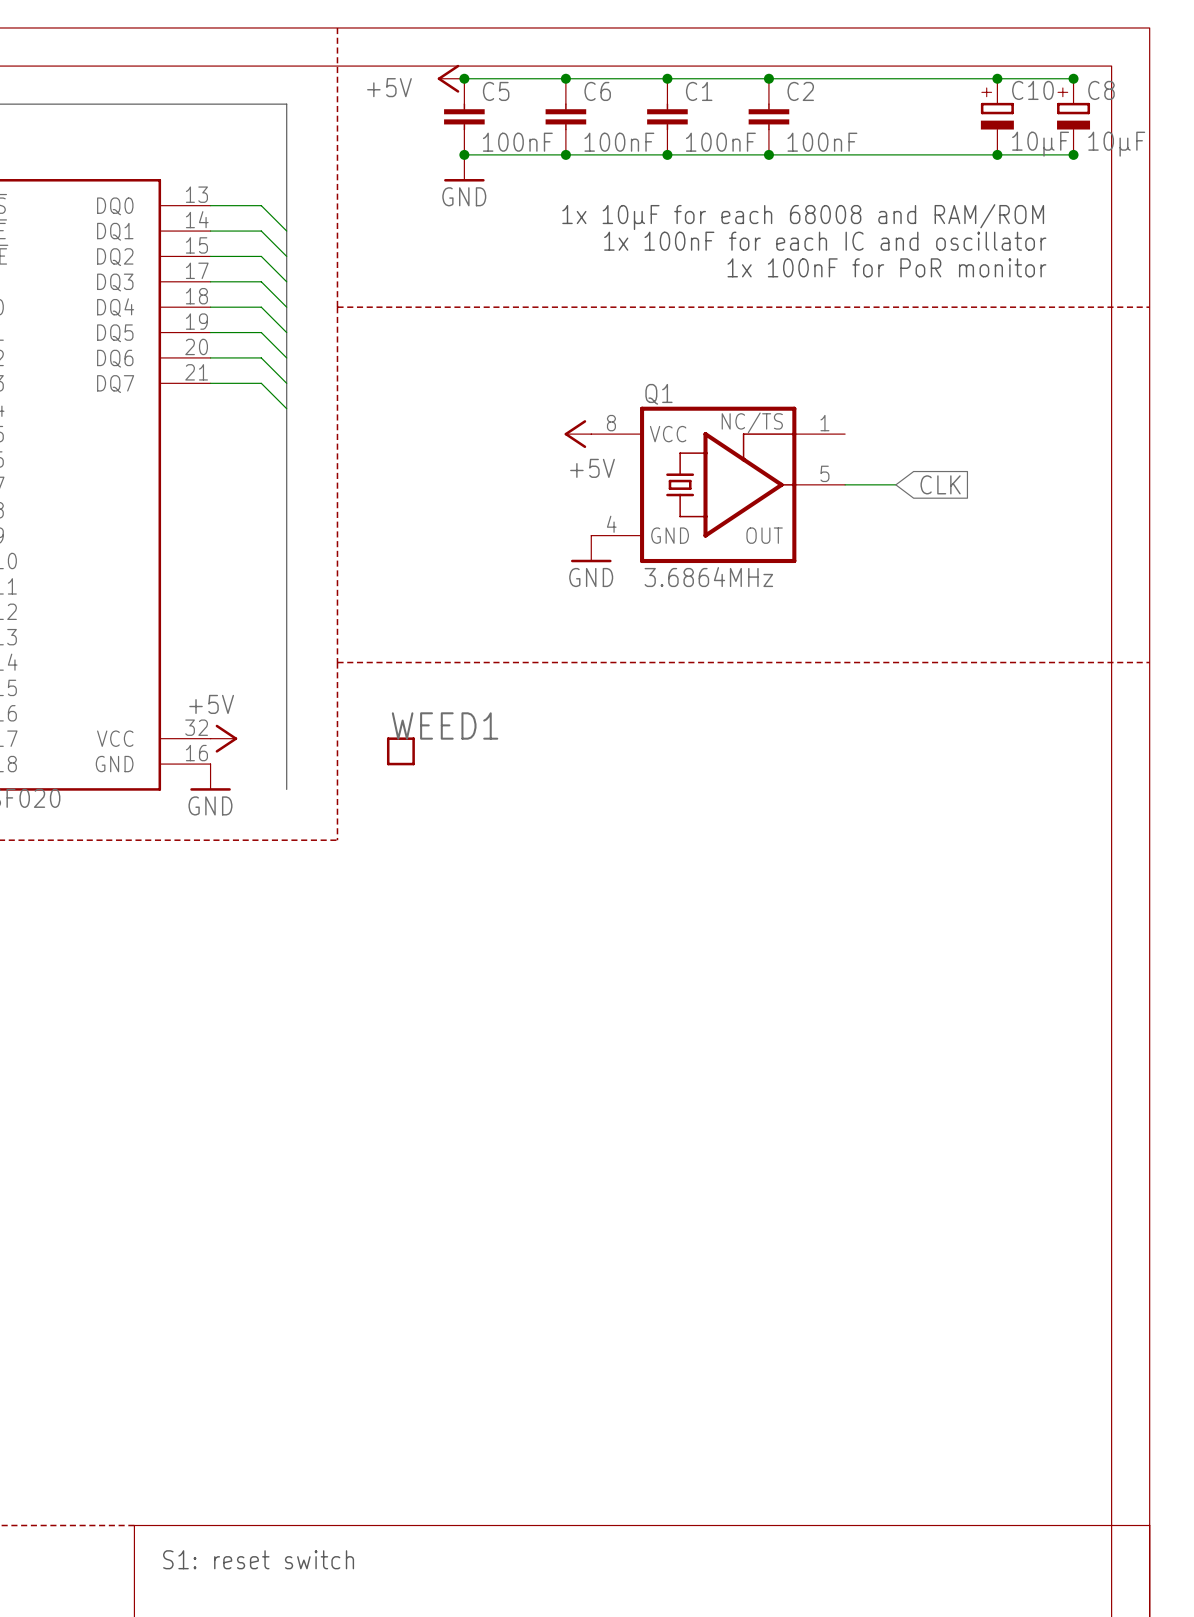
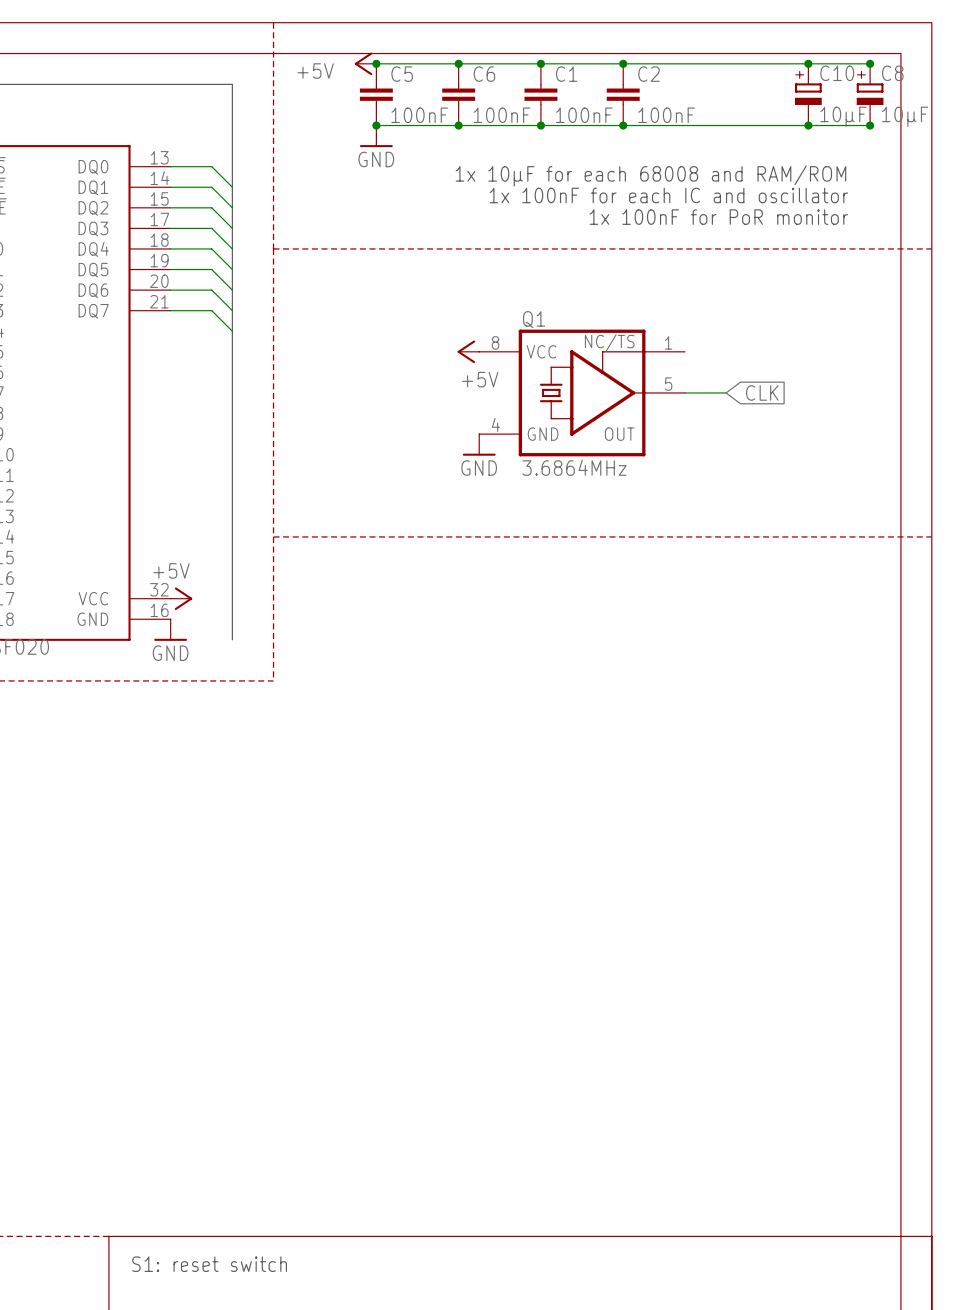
WEED1: (400, 751) -> none

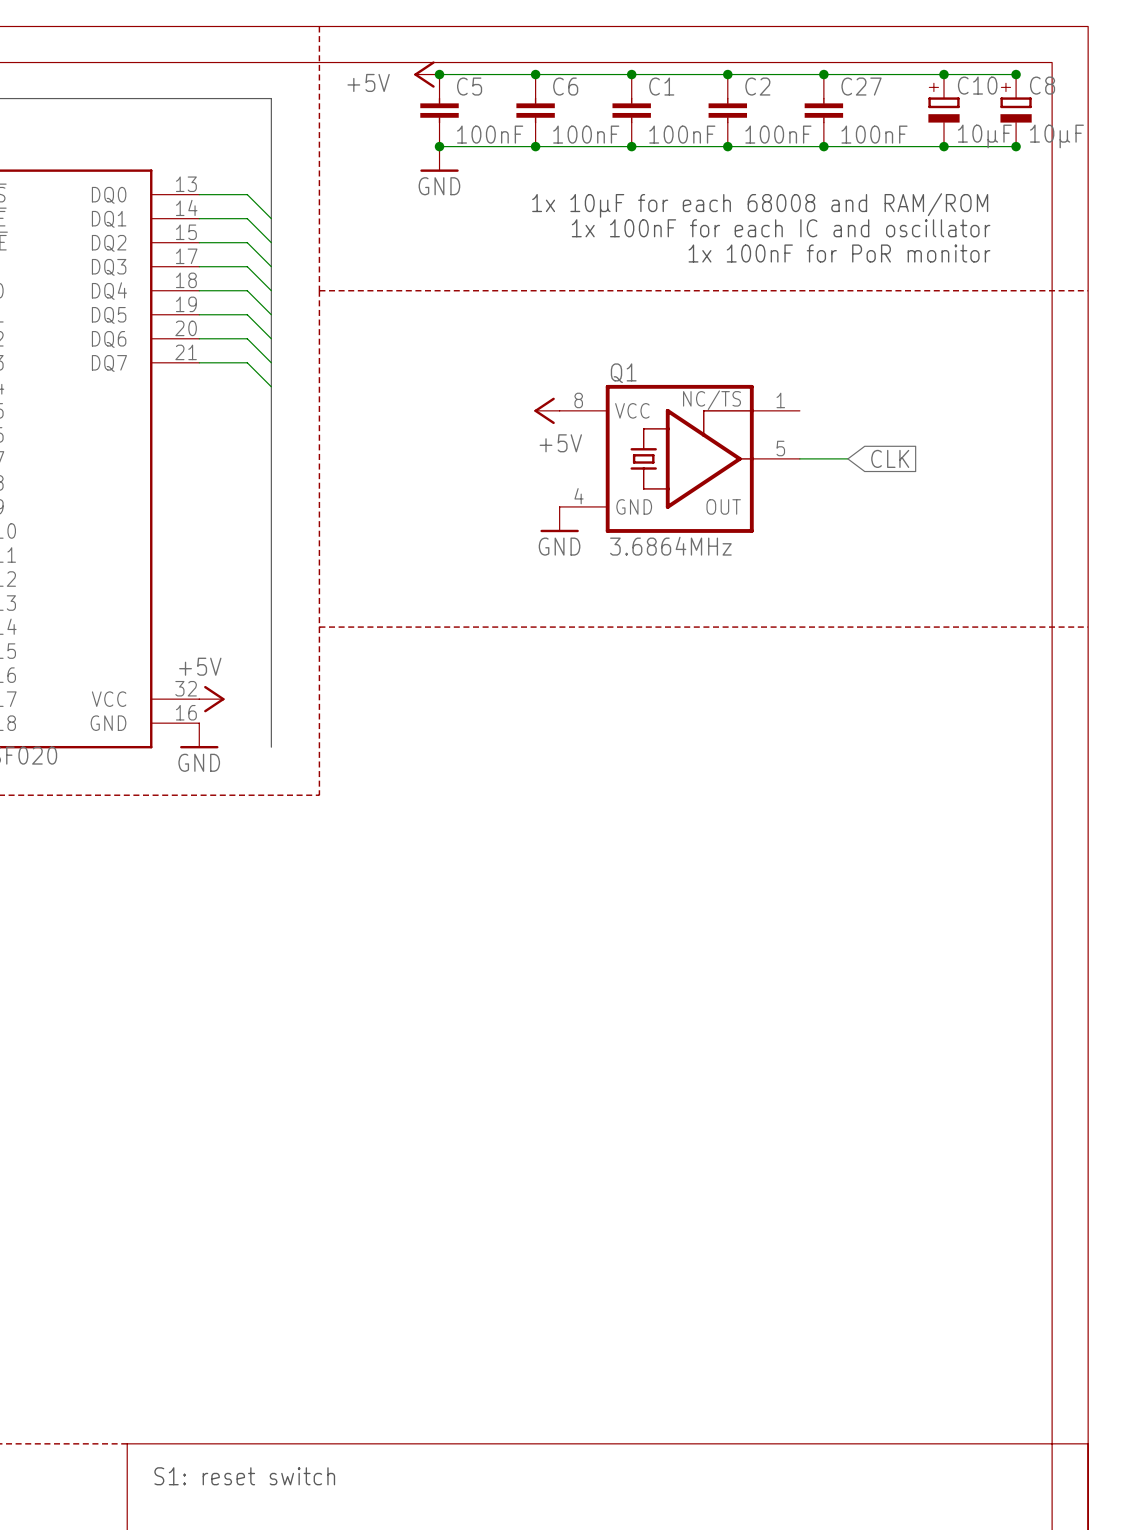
junction: none -> (823, 74)
C27: none -> 100nF (823, 110)
junction: none -> (823, 146)

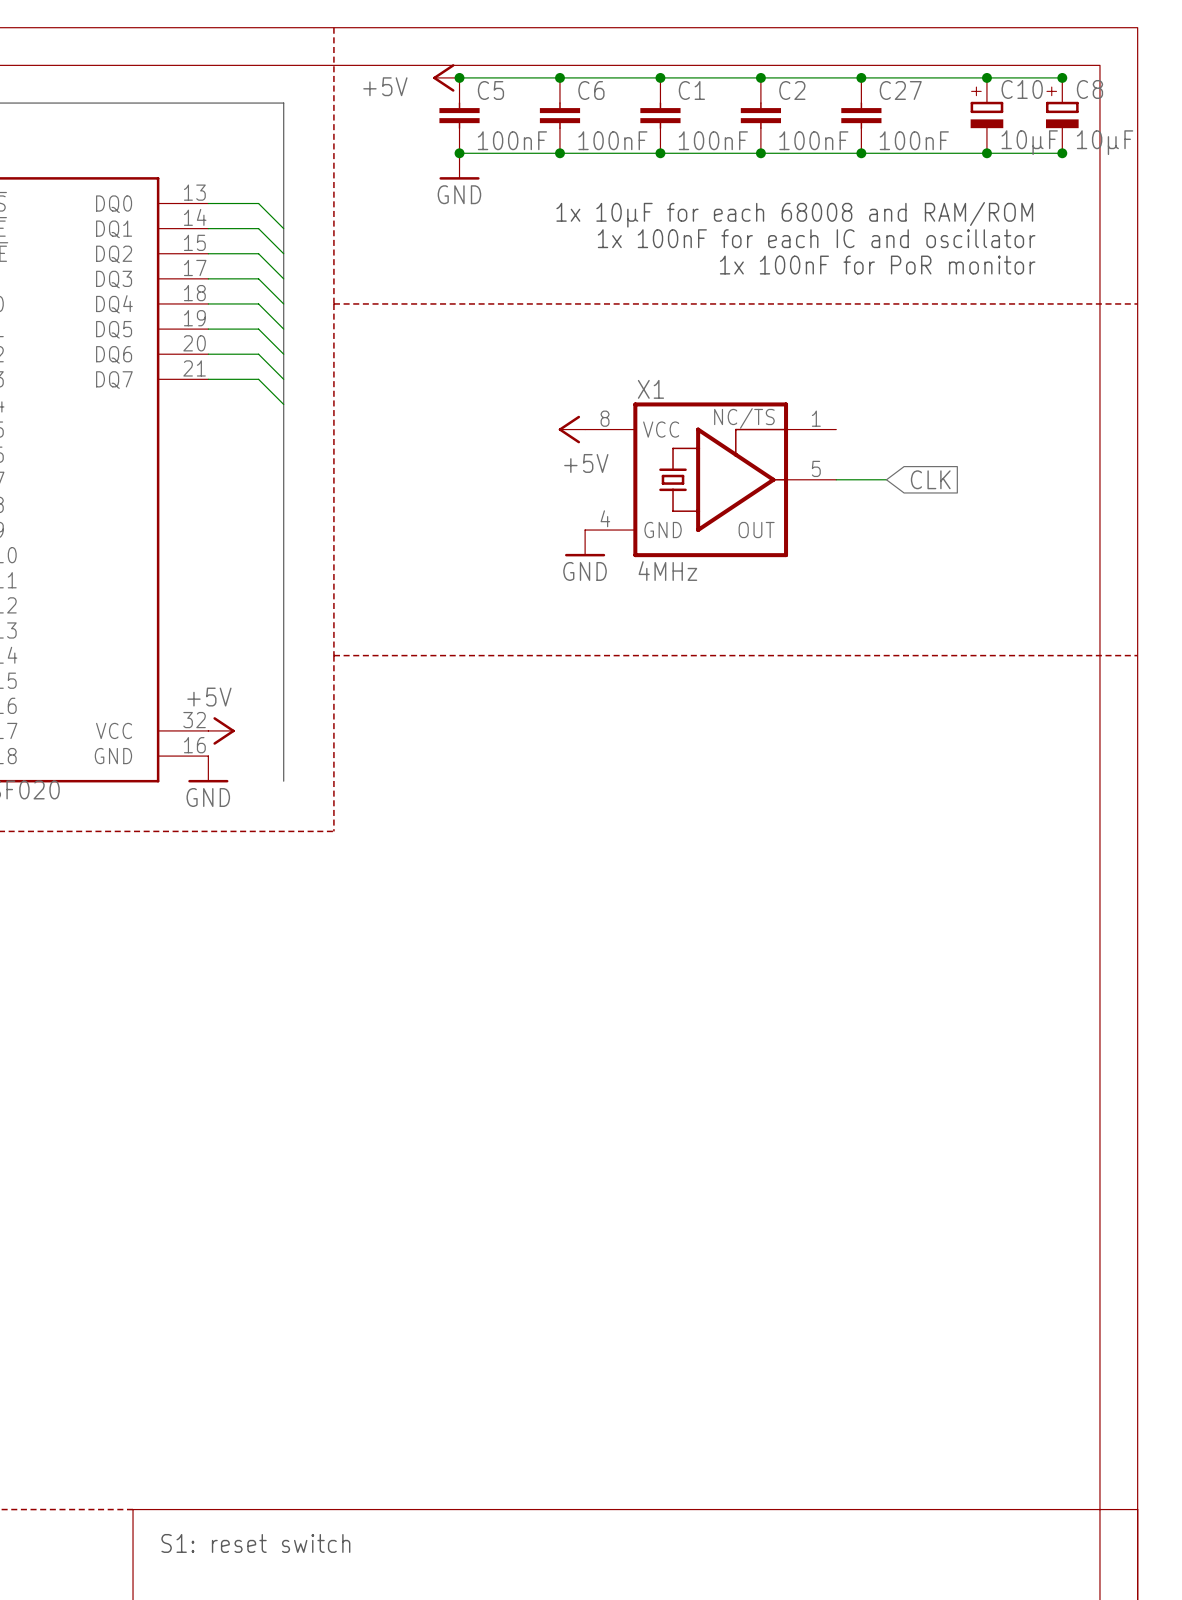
Q1 name: Q1 (623, 373) -> X1 (650, 389)
Q1 value: 3.6864MHz (670, 546) -> 4MHz (667, 571)

